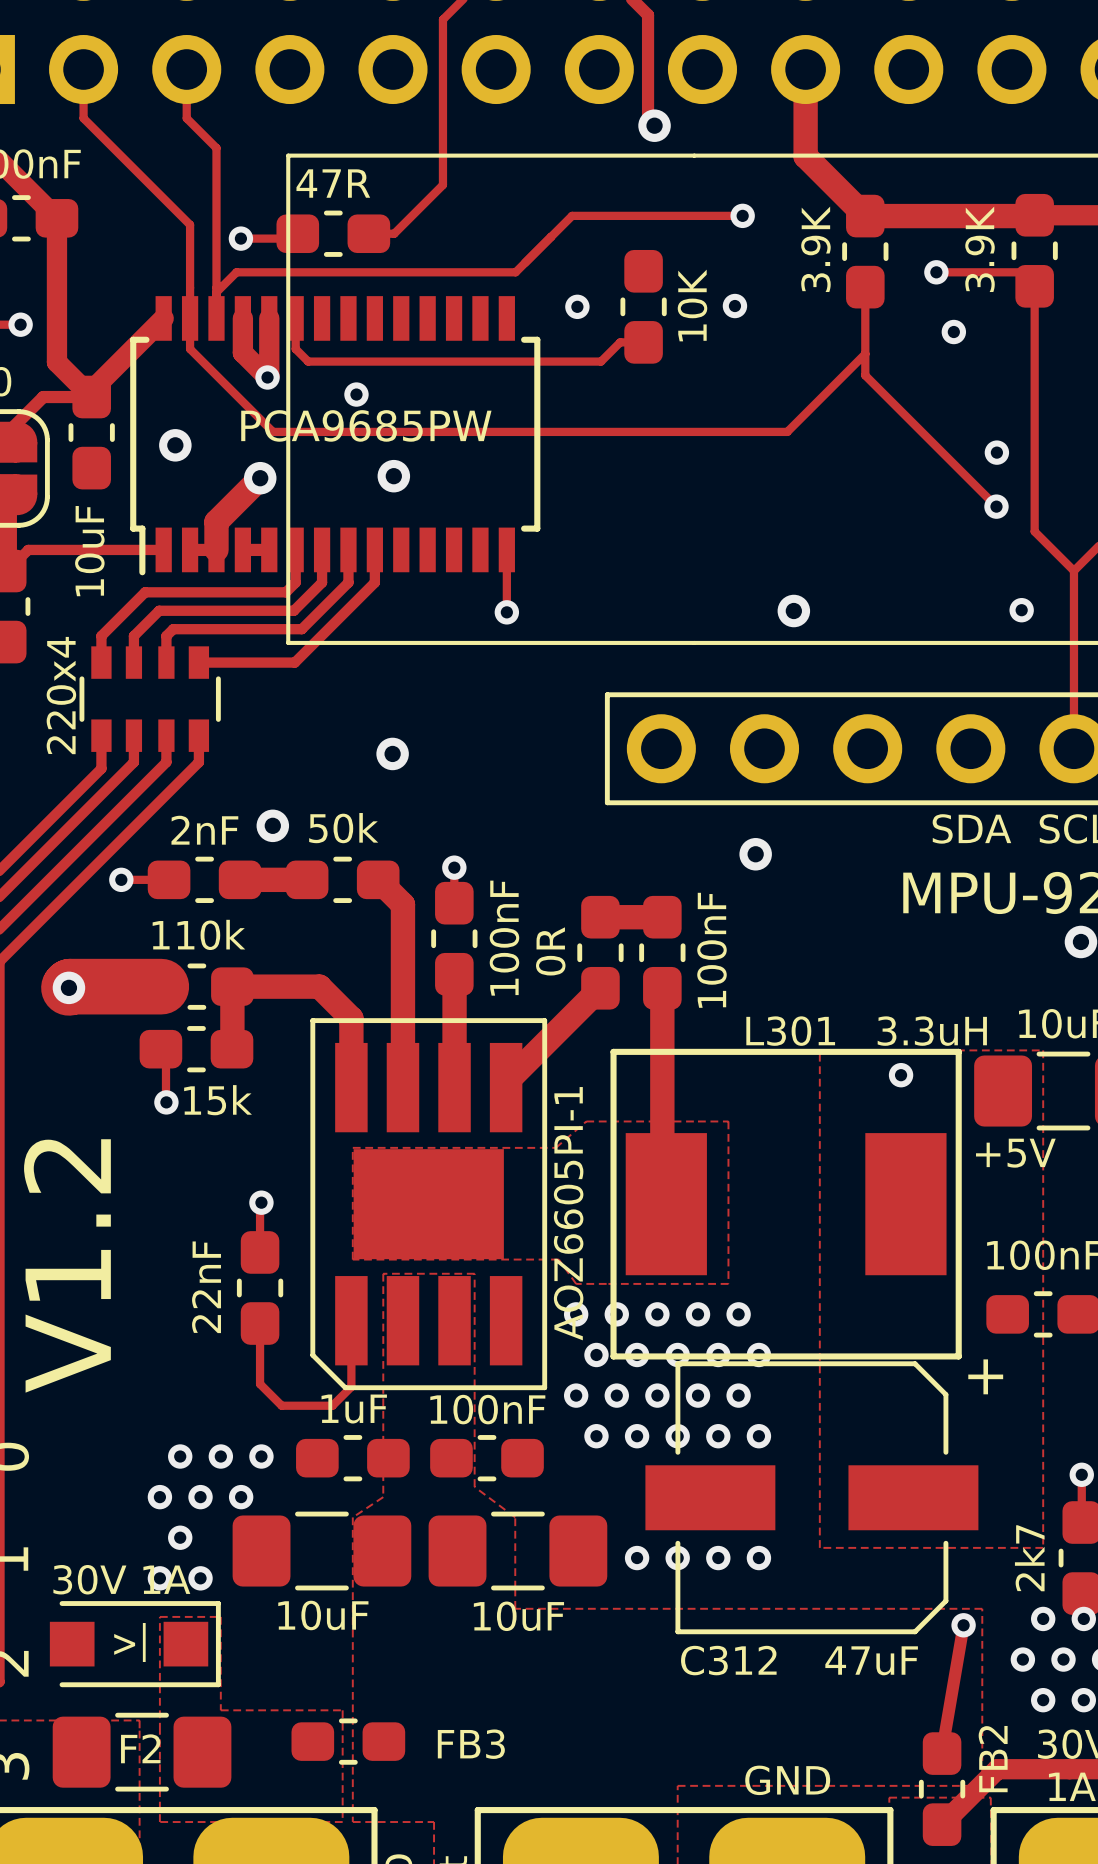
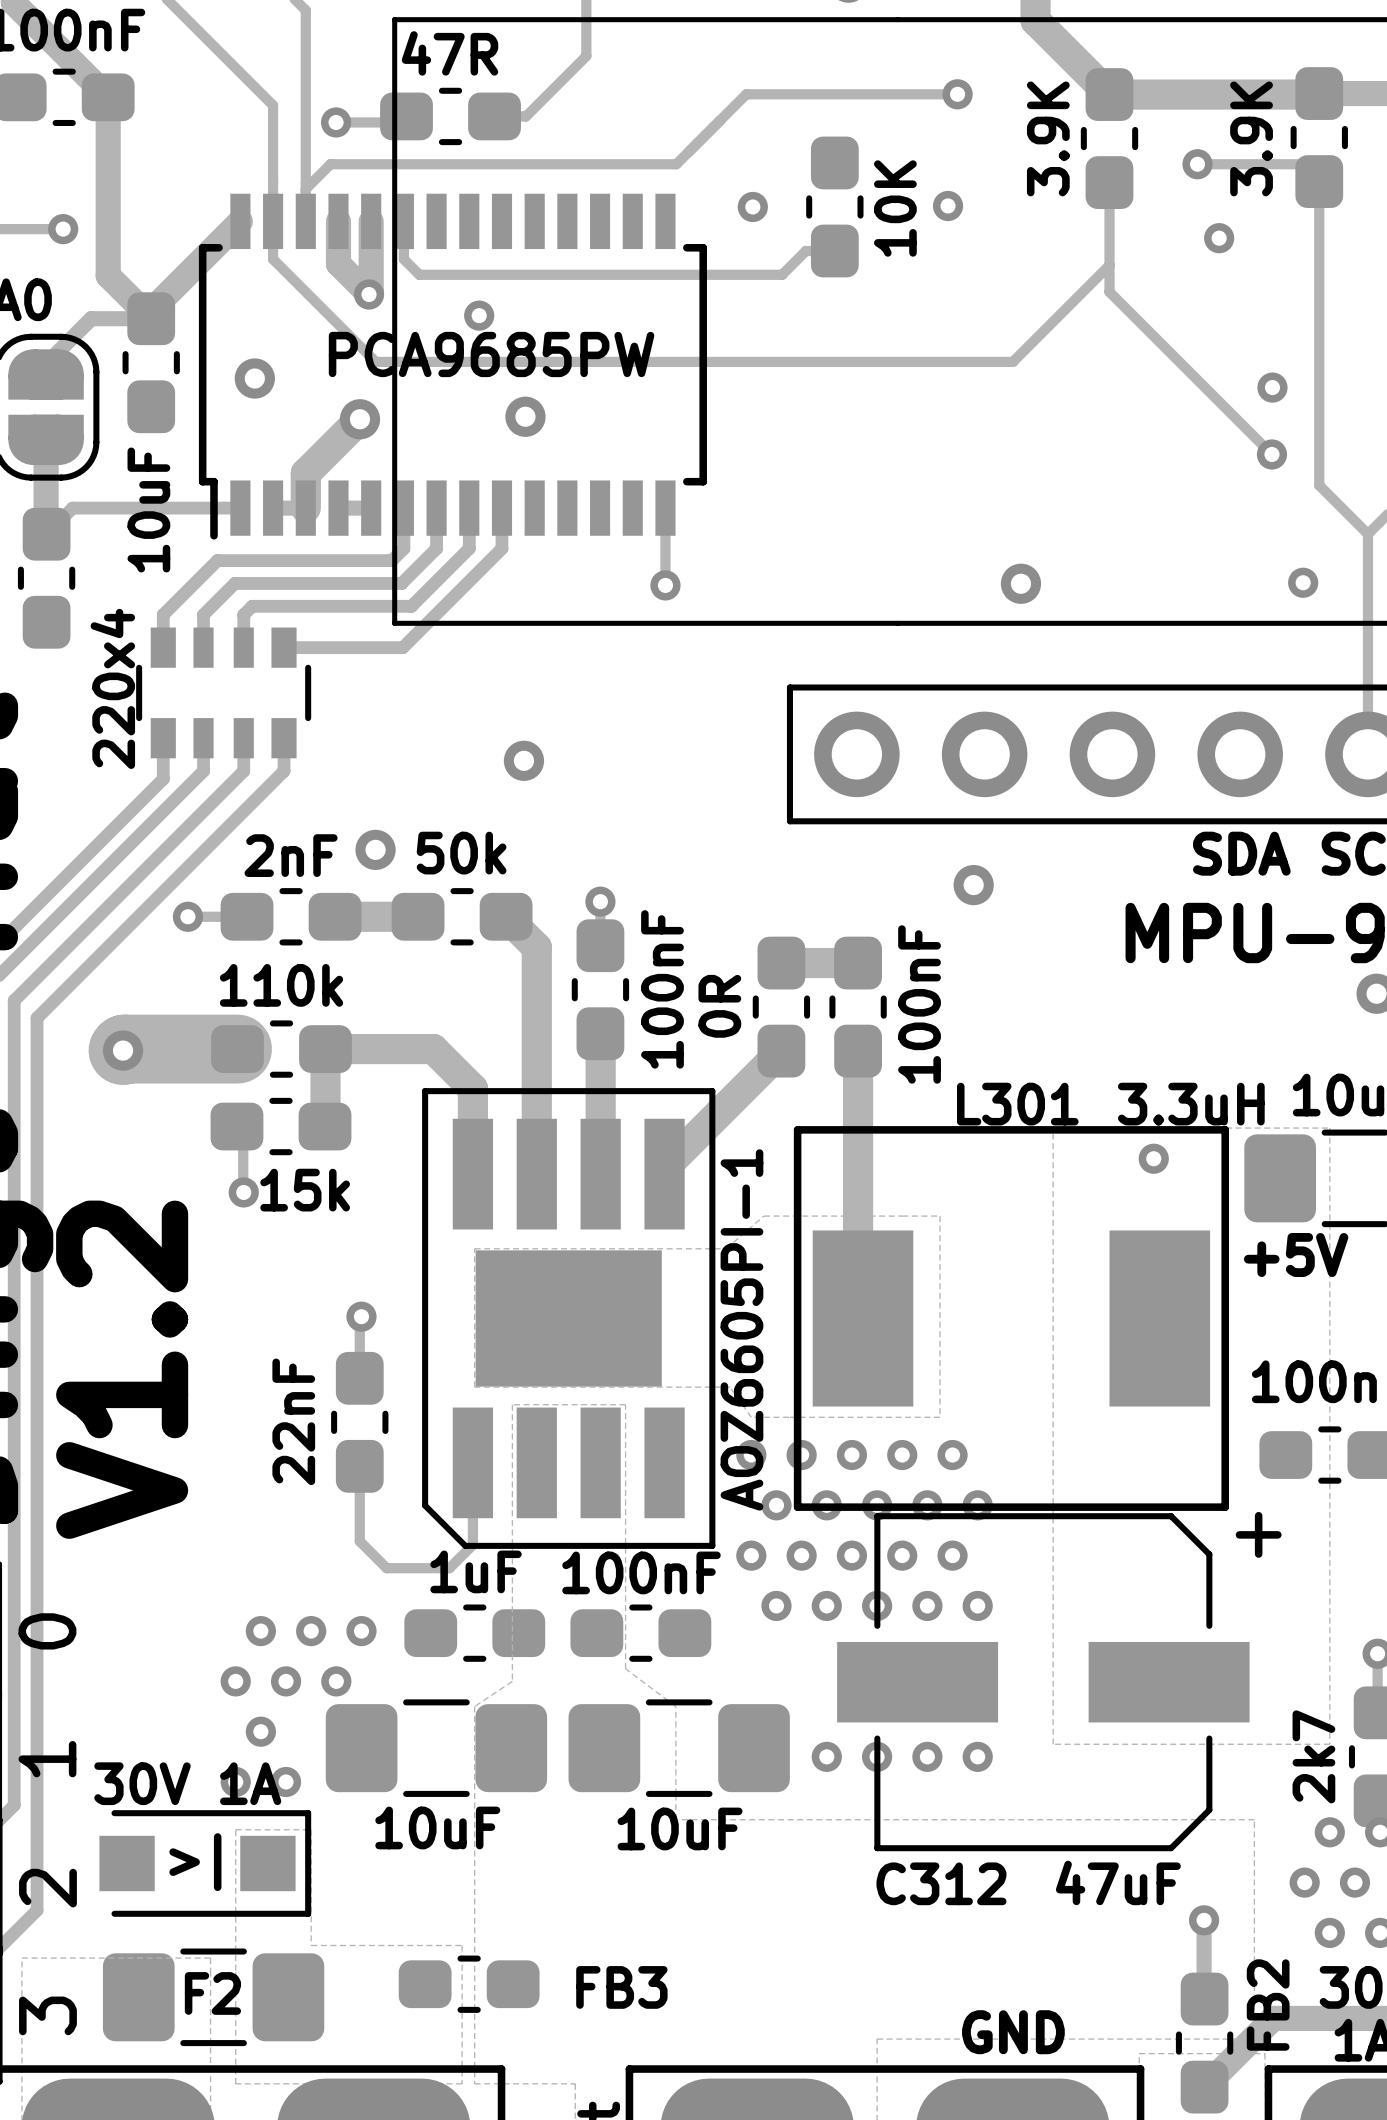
track: (963, 1625) (941, 1753) -> (1204, 1920) (1204, 1998)
via position: (963, 1625) -> (1204, 1920)

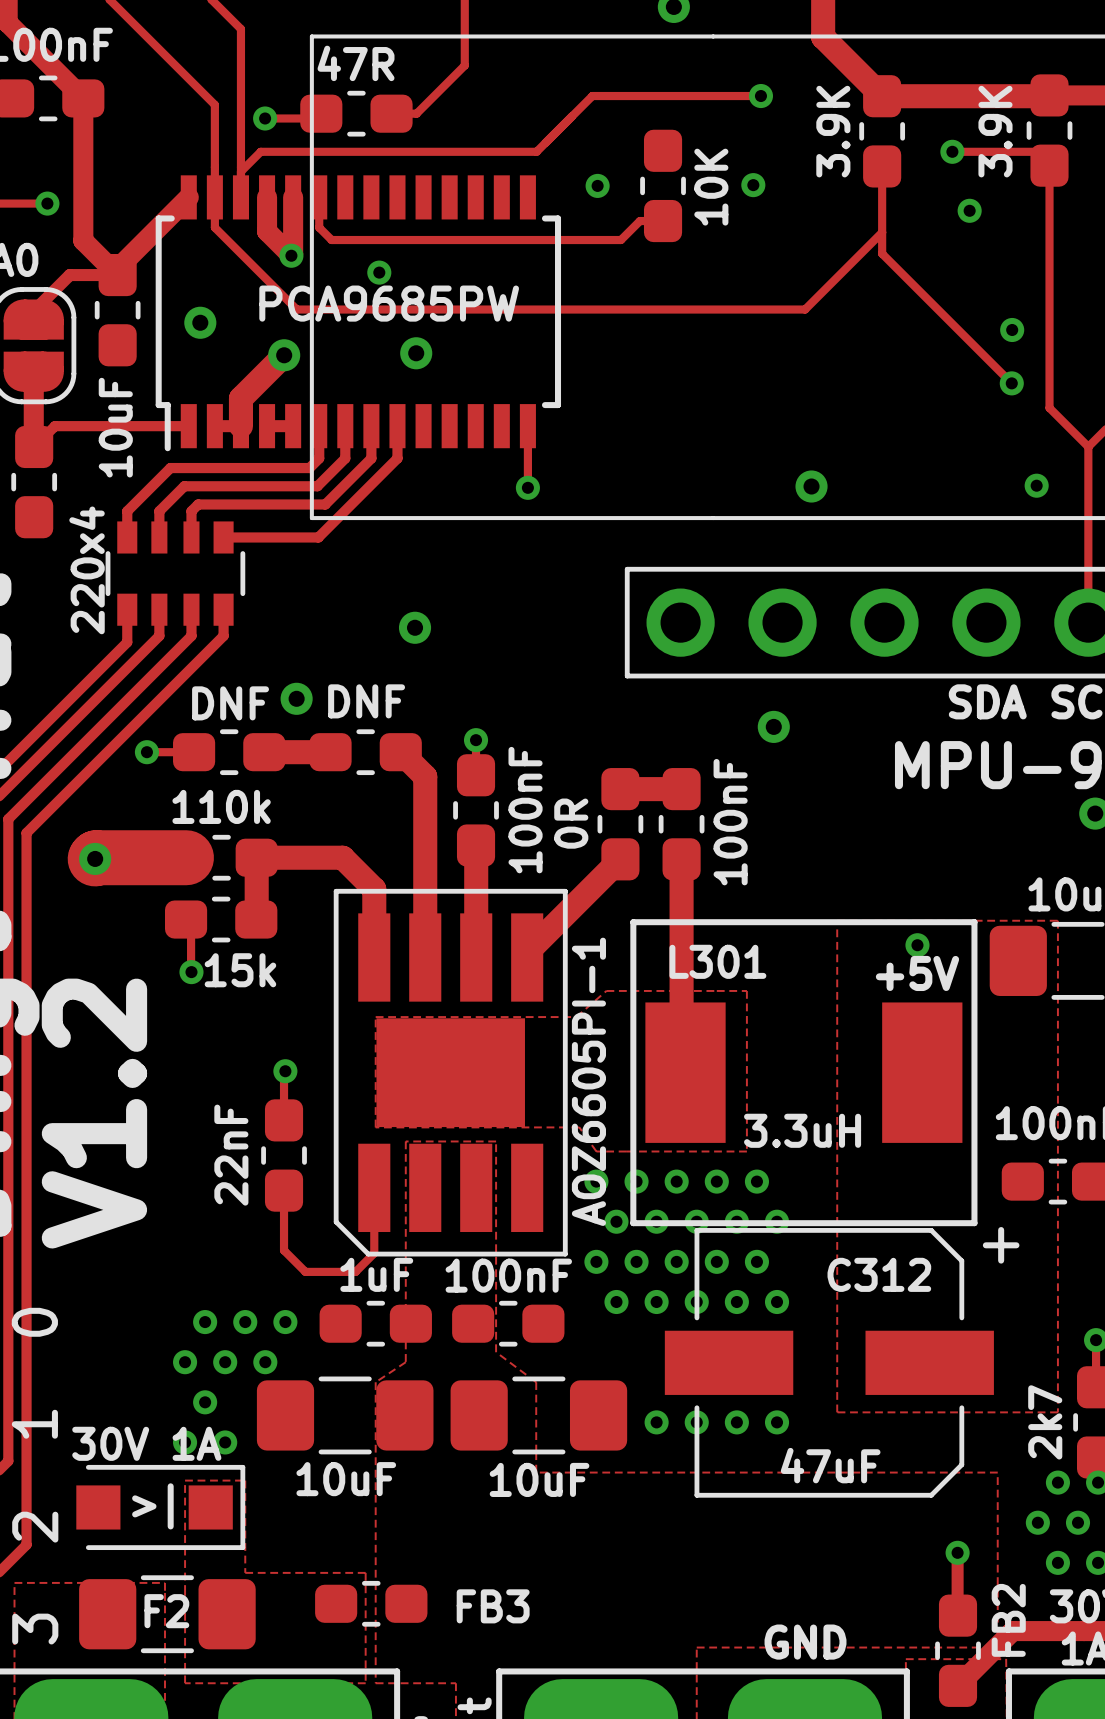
part value: 50k (461, 853) -> DNF (366, 701)
part value: 2nF (291, 855) -> DNF (230, 703)
L301 name position: L301 (1017, 1104) -> L301 (717, 961)
L301 value position: 3.3uH (1191, 1104) -> 3.3uH (802, 1130)
text position: +5V (1296, 1255) -> +5V (917, 973)
C312 value position: 47uF (1118, 1882) -> 47uF (830, 1465)
C312 name position: C312 (941, 1883) -> C312 (879, 1274)

